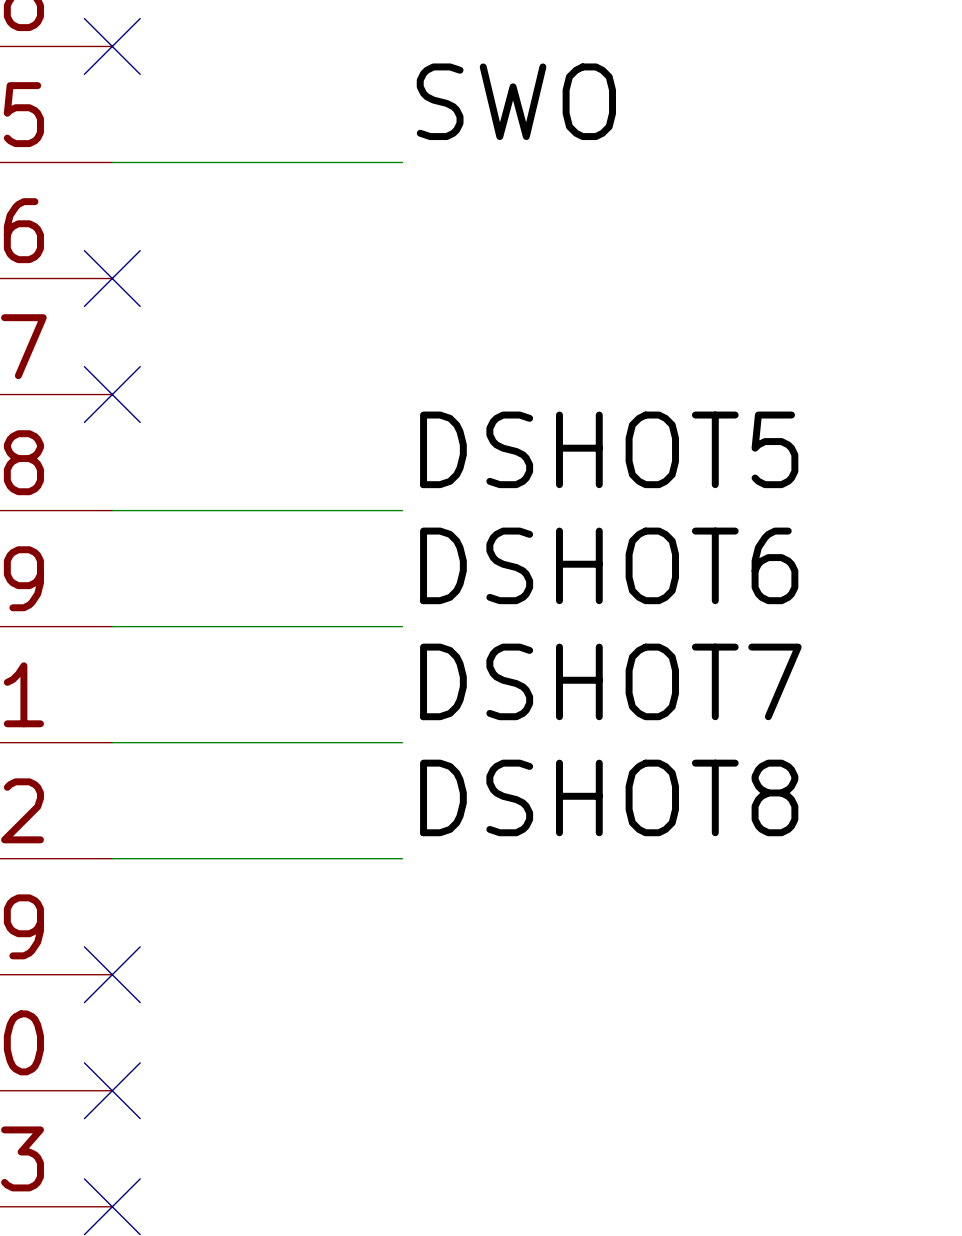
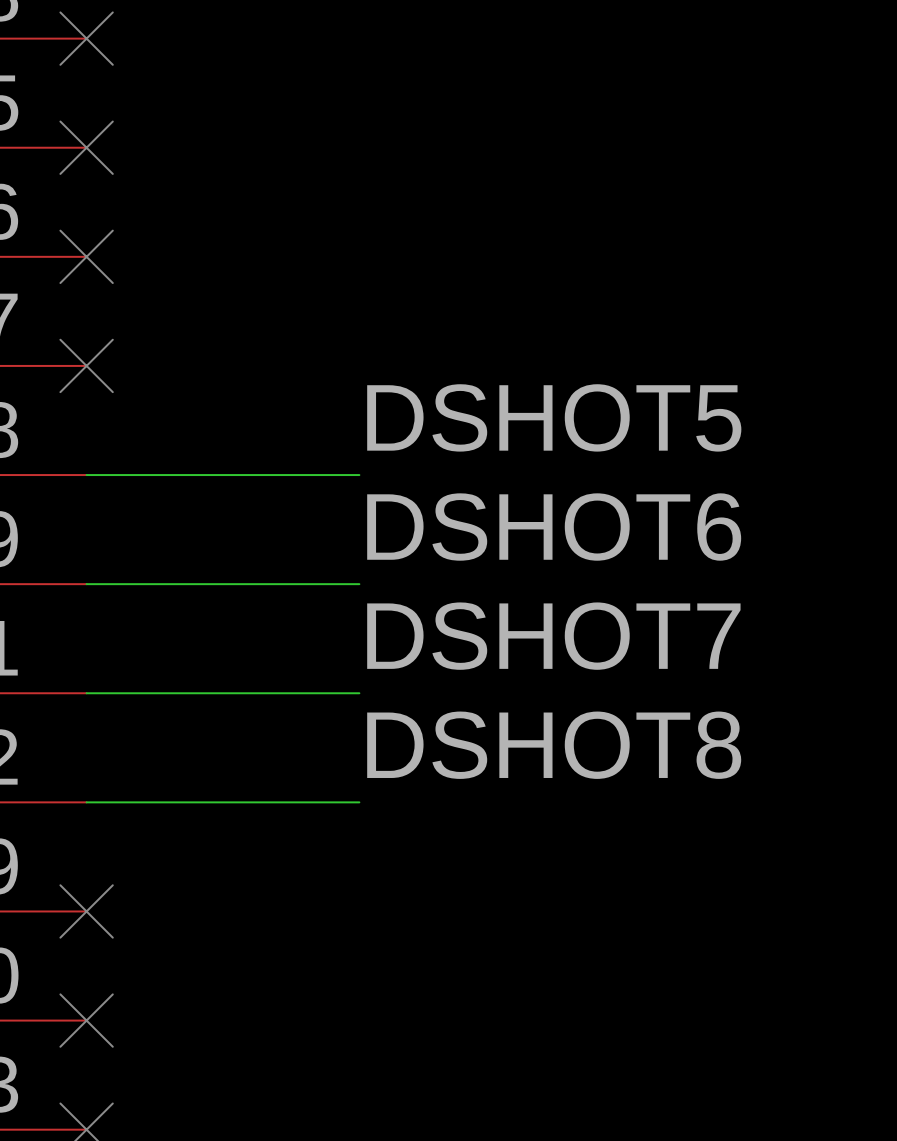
label: SWO (516, 101) -> none
wire: (112, 162) (402, 162) -> none
no-connect mark: none -> (86, 147)

